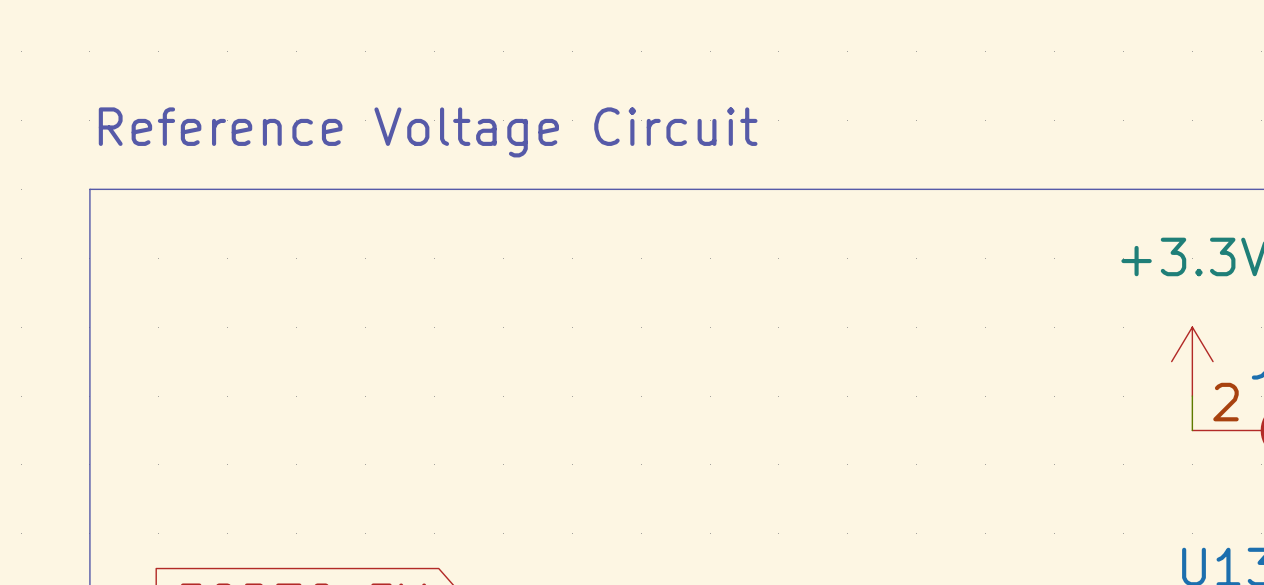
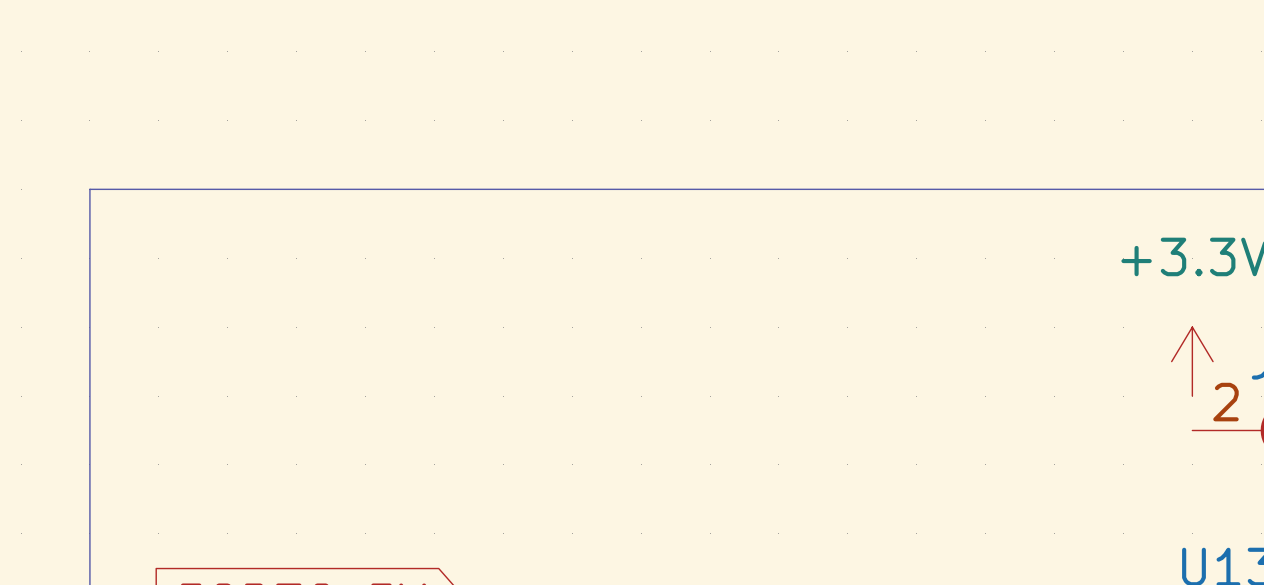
text: Reference Voltage Circuit (428, 132) -> none
wire: (1192, 396) (1192, 430) -> none

